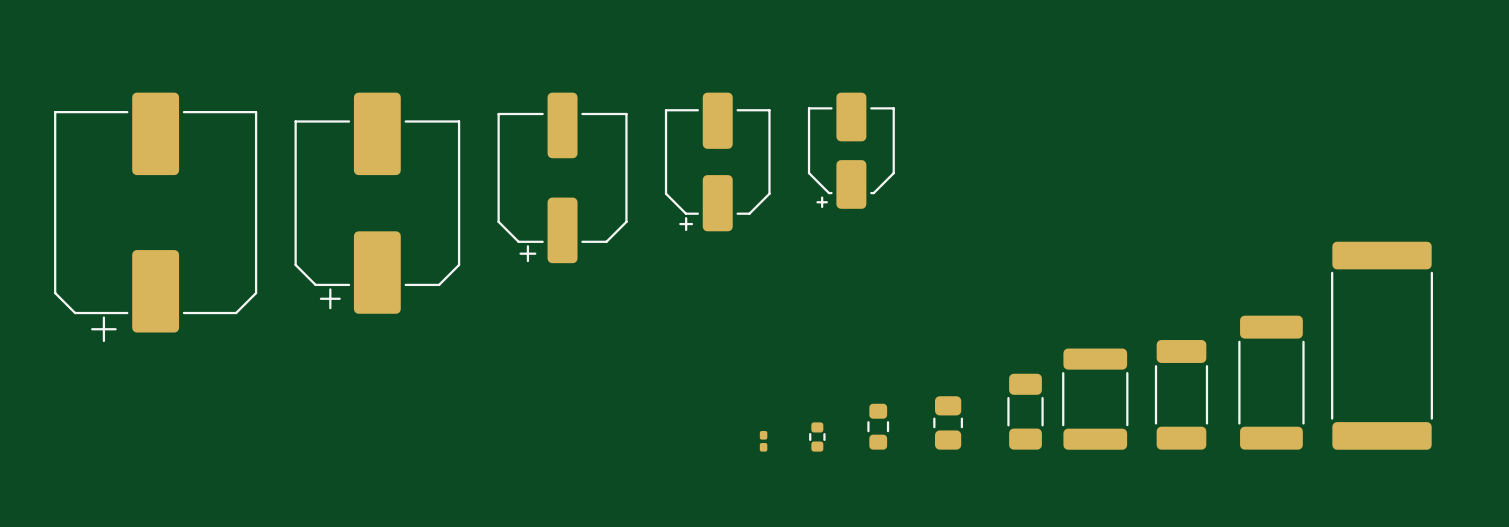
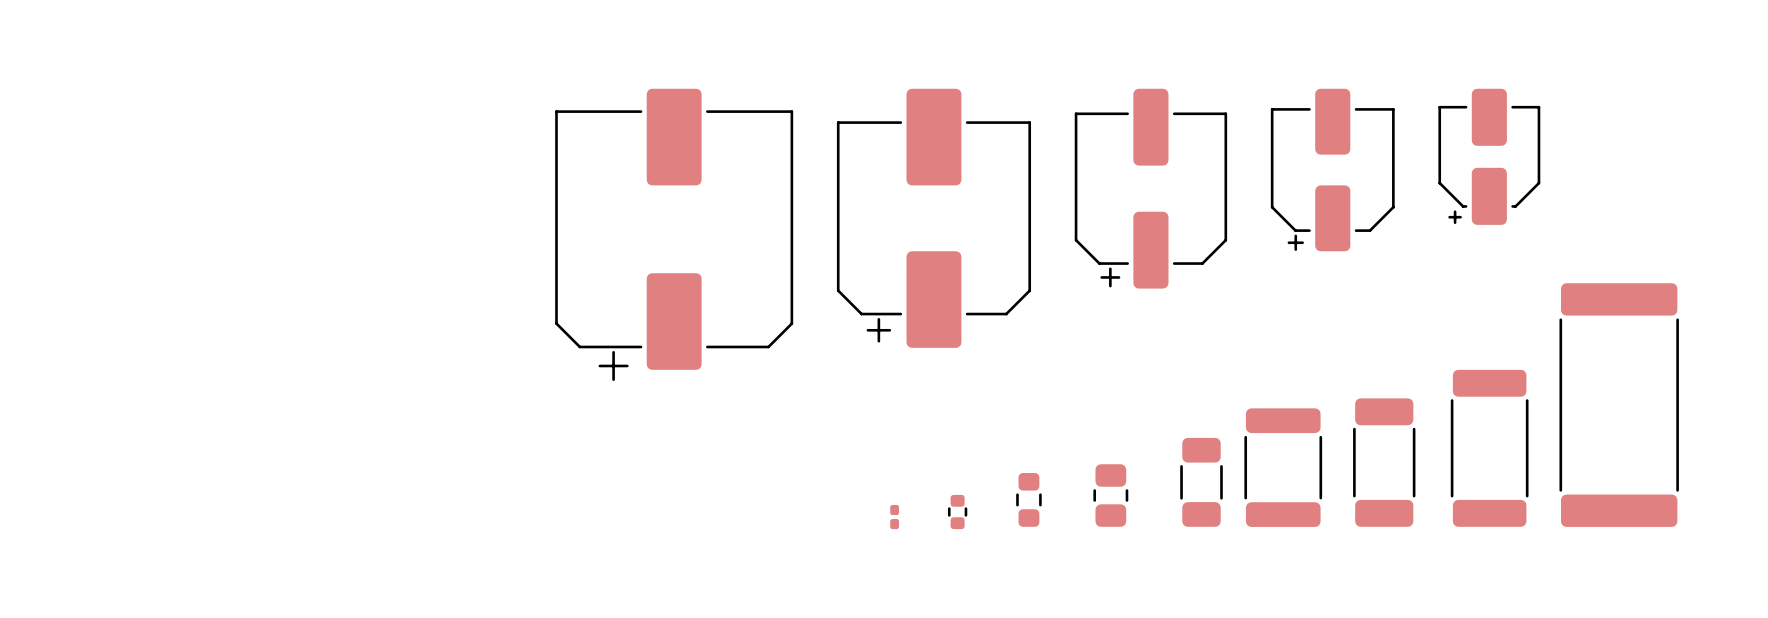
part position: (851, 150) -> (1489, 156)
part position: (717, 161) -> (1332, 170)
part position: (562, 177) -> (1150, 188)
part position: (377, 203) -> (933, 218)
part position: (155, 217) -> (674, 234)

